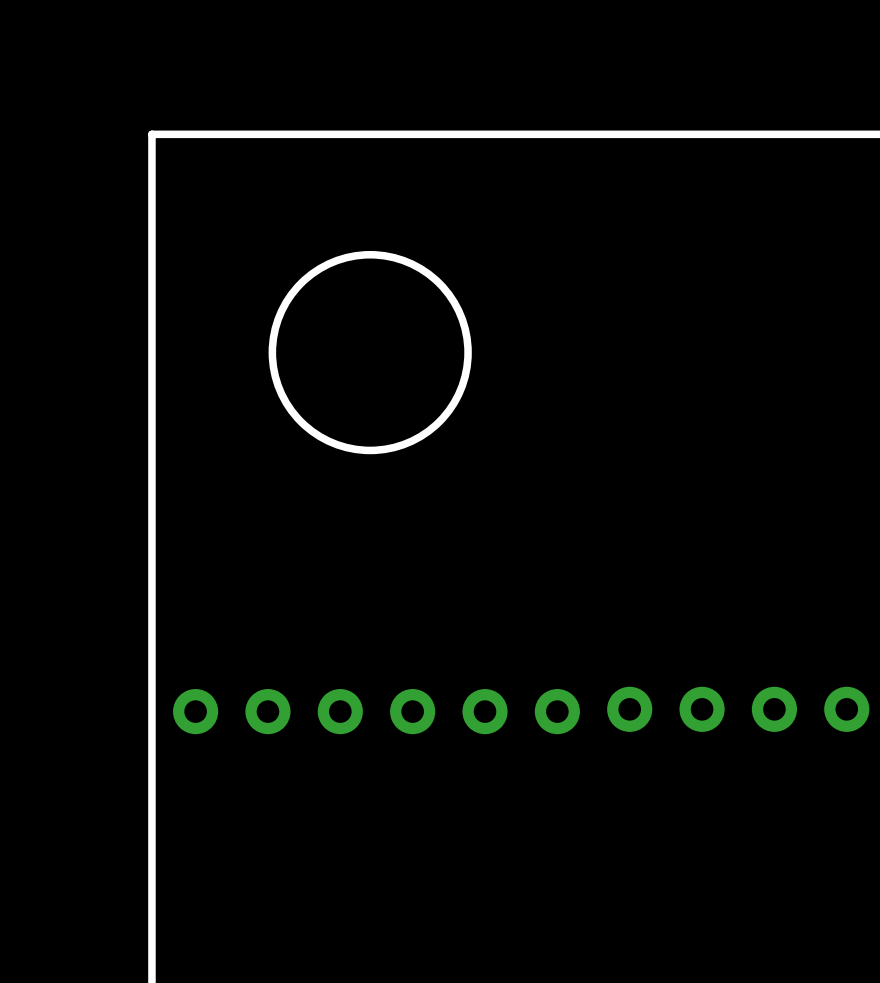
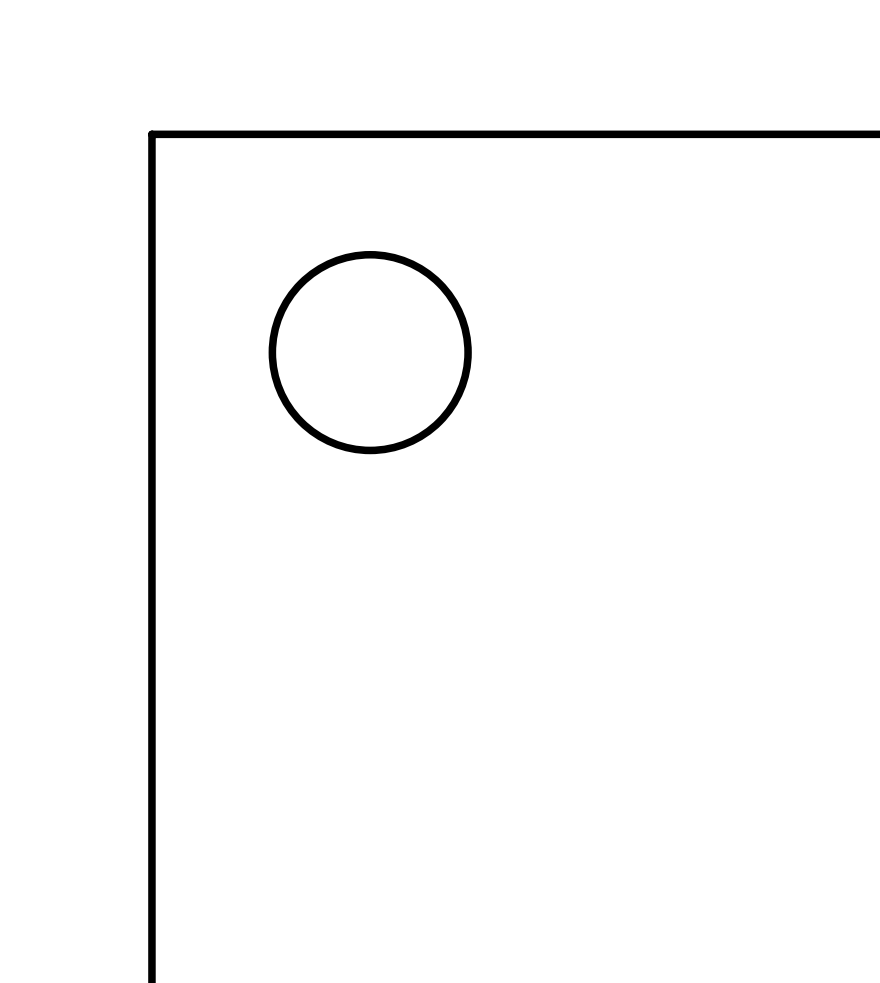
via: (629, 709) -> none
via: (702, 709) -> none
via: (774, 709) -> none
via: (846, 709) -> none
via: (195, 711) -> none
via: (267, 711) -> none
via: (340, 711) -> none
via: (412, 711) -> none
via: (485, 711) -> none
via: (557, 711) -> none

